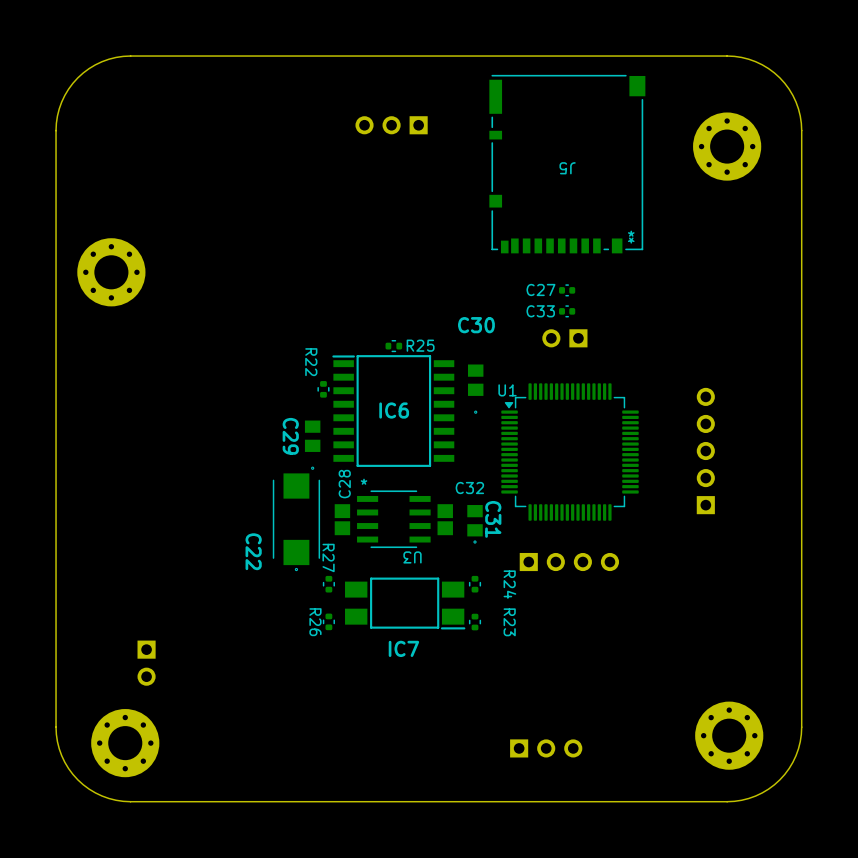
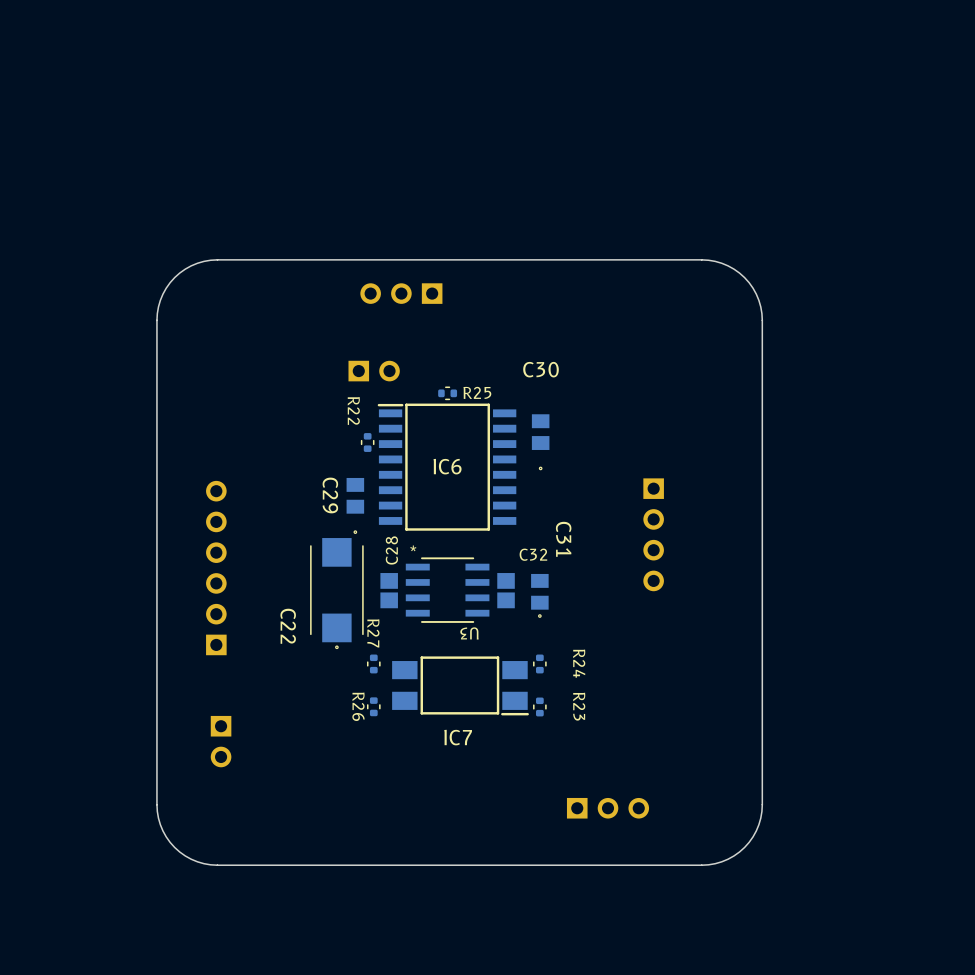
board edge: (727, 56) (130, 56) (102, 61) (89, 68) (72, 83) (59, 108) (56, 130) (56, 727) (61, 755) (68, 768) (83, 784) (102, 796) (130, 801) (727, 801) (748, 798) (762, 792) (784, 774) (798, 748) (801, 727) (801, 123) (796, 102) (779, 77) (755, 61) (727, 56) -> (701, 259) (715, 261) (728, 265) (744, 277) (756, 294) (761, 313) (762, 804) (758, 824) (749, 842) (739, 852) (728, 859) (715, 863) (701, 865) (217, 865) (197, 861) (179, 852) (170, 842) (162, 830) (158, 818) (156, 804) (156, 320) (160, 300) (170, 282) (179, 273) (191, 265) (204, 261) (217, 259) (701, 259)
part position: (391, 125) -> (401, 293)
part: (727, 146) -> none
J5: (567, 164) -> none
part: (111, 272) -> none
C27: (567, 290) -> none
C33: (567, 311) -> none
part: none -> (374, 371)
part: (564, 338) -> none
part: (705, 451) -> none
U1: (570, 452) -> none
part: none -> (216, 568)
C31 name position: C31 (493, 519) -> C31 (563, 539)
part rotation: 0° (569, 562) -> 90° clockwise (653, 534)
part position: (569, 562) -> (653, 534)
part position: (146, 663) -> (221, 741)
part: (729, 735) -> none
part: (125, 743) -> none
part position: (546, 748) -> (608, 808)

